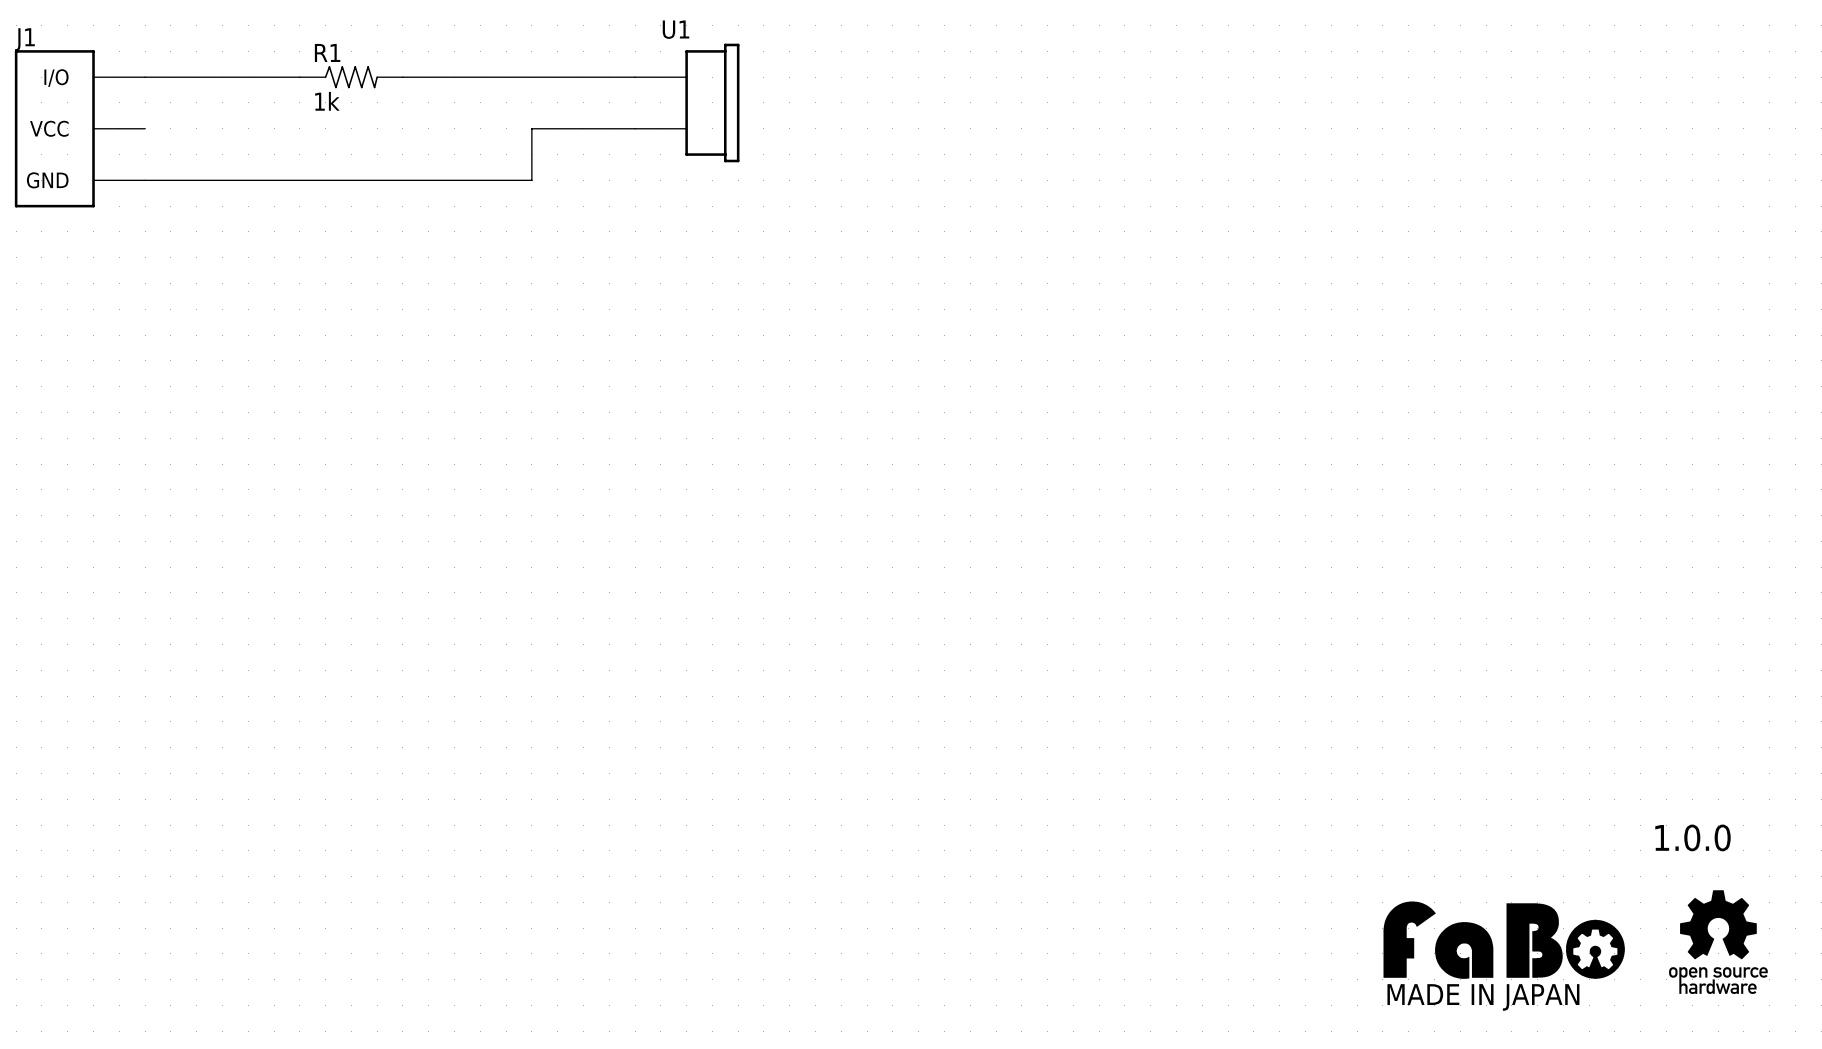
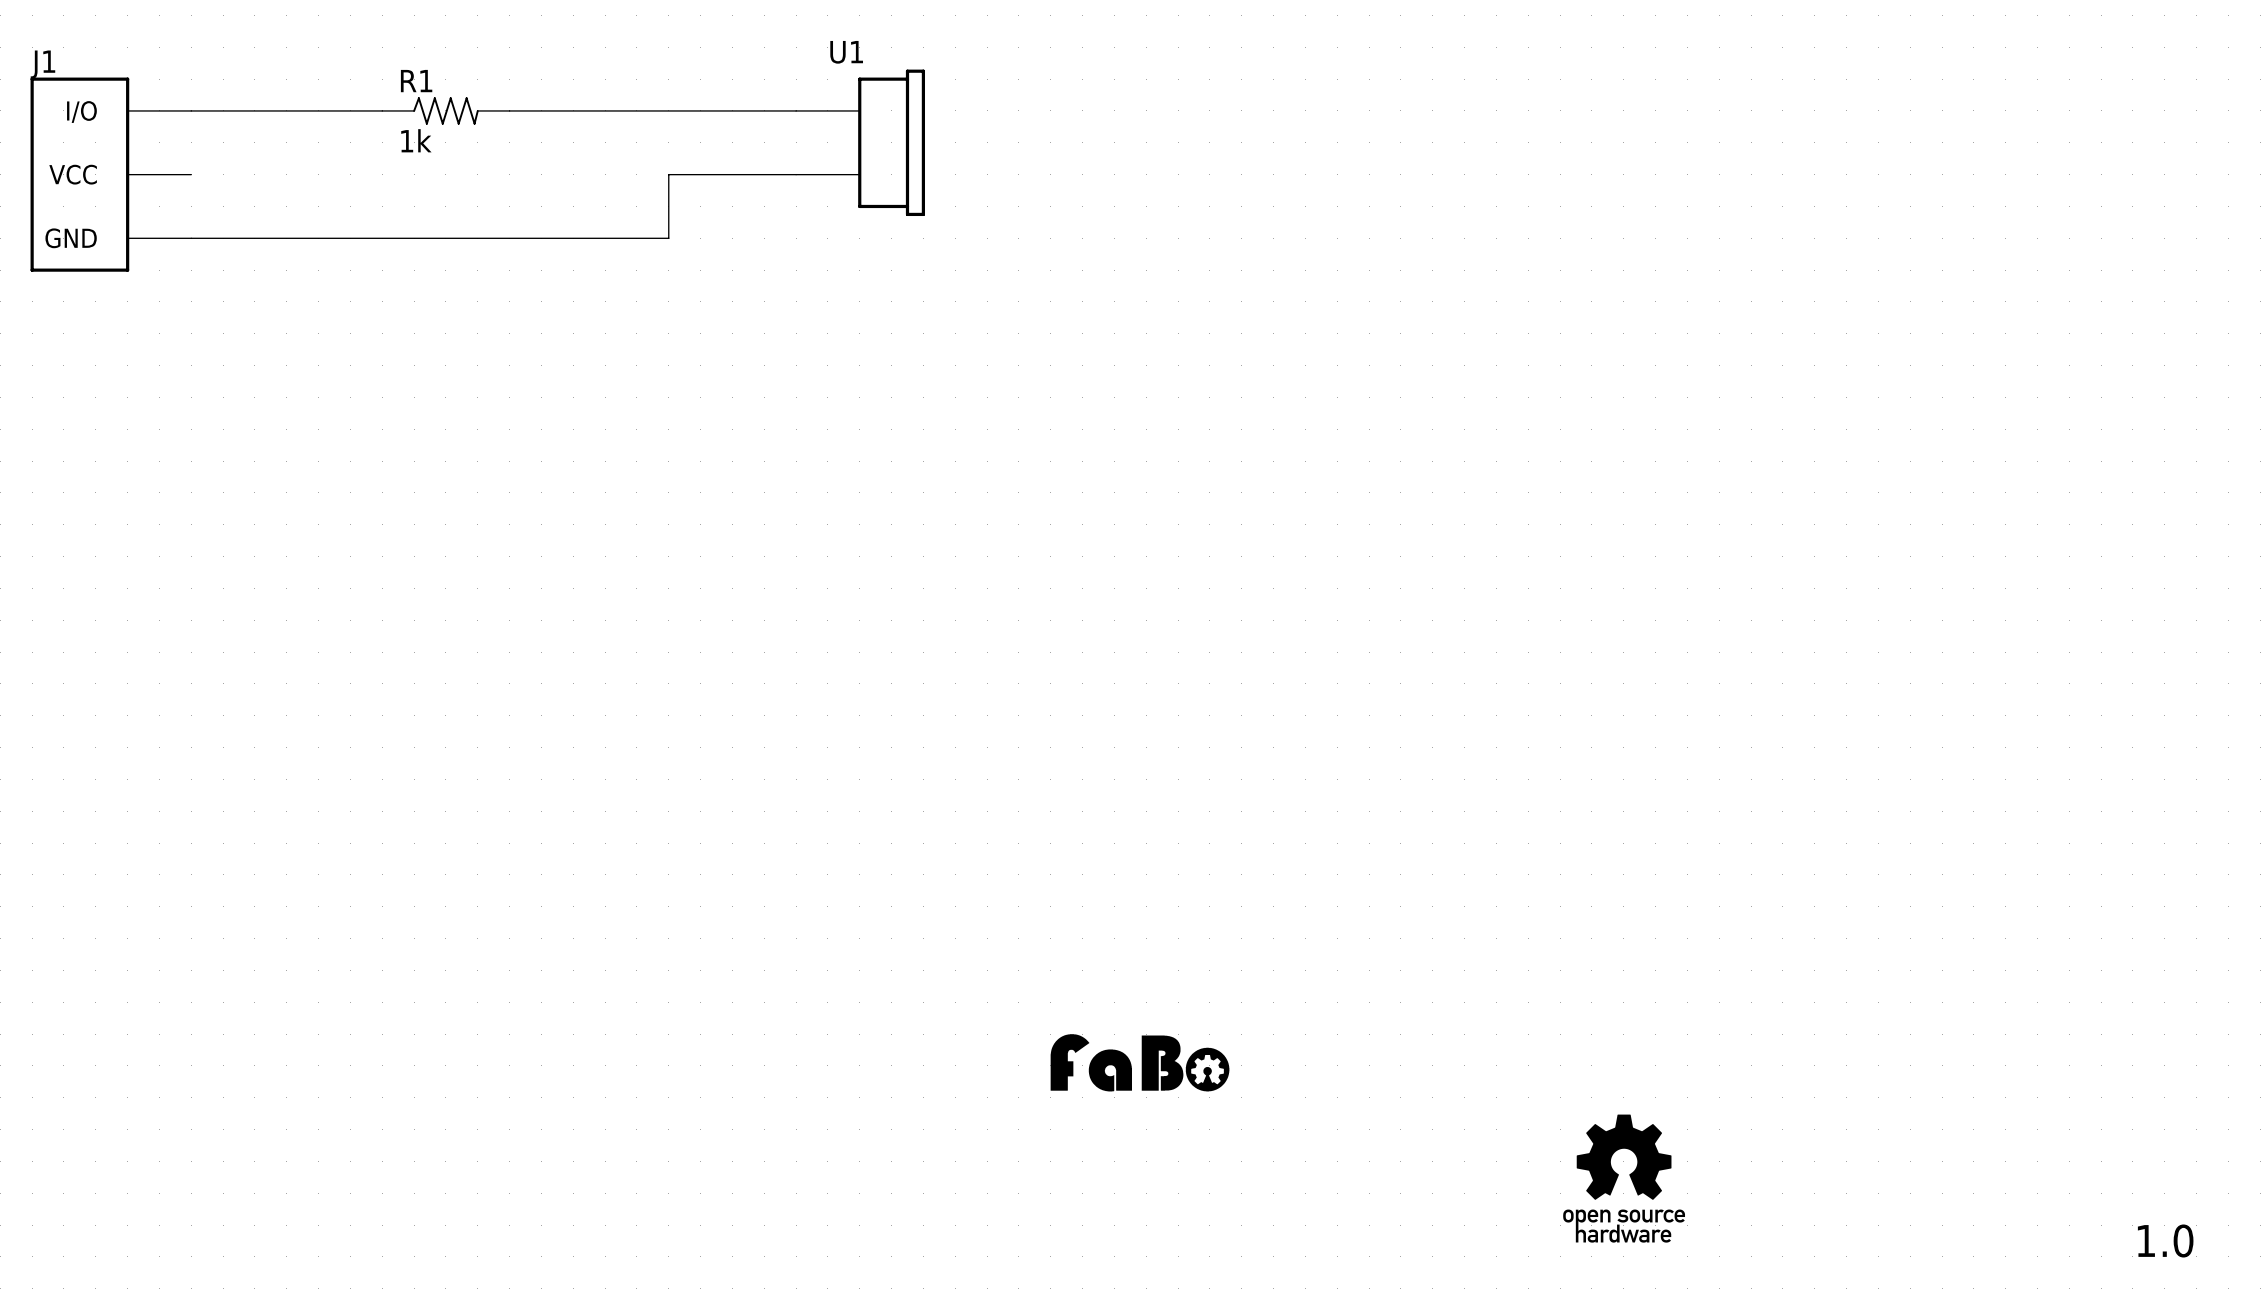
text: 1.0.0 (1692, 837) -> none
part: none -> (1140, 1062)
part: (1504, 940) -> none
part: none -> (1624, 1178)
part: (1718, 942) -> none
text: none -> 1.0 (2165, 1241)

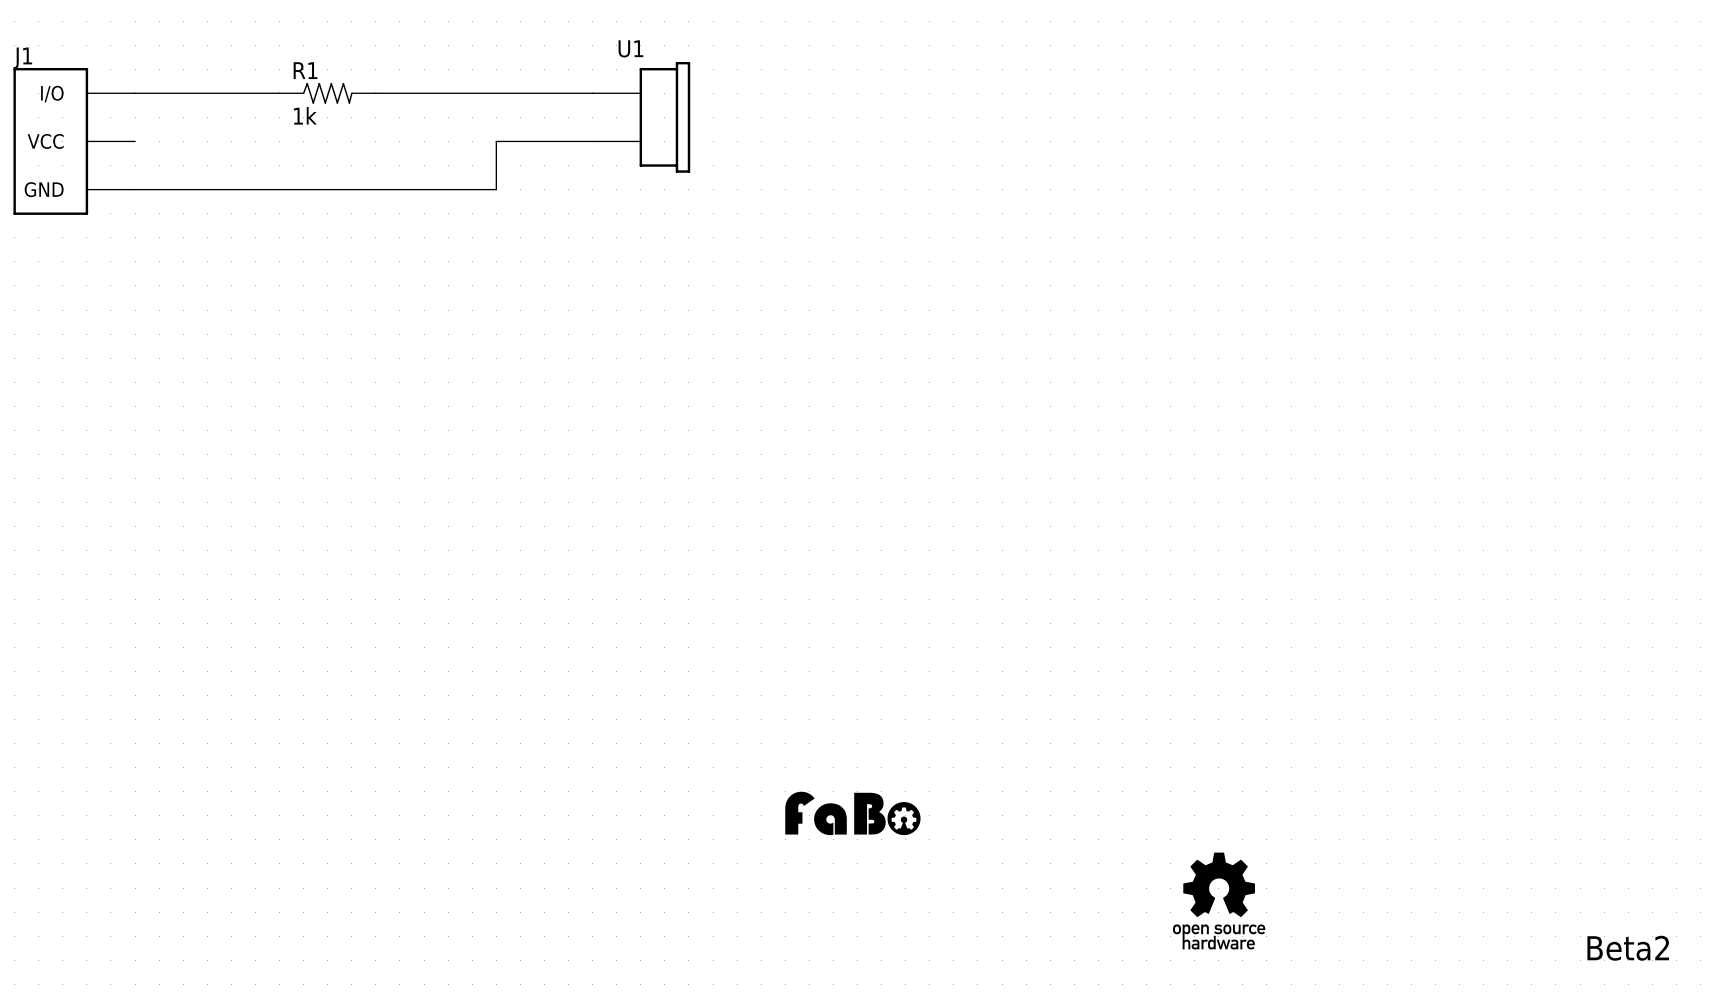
text: 1.0 (2165, 1241) -> Beta2 (1628, 948)

